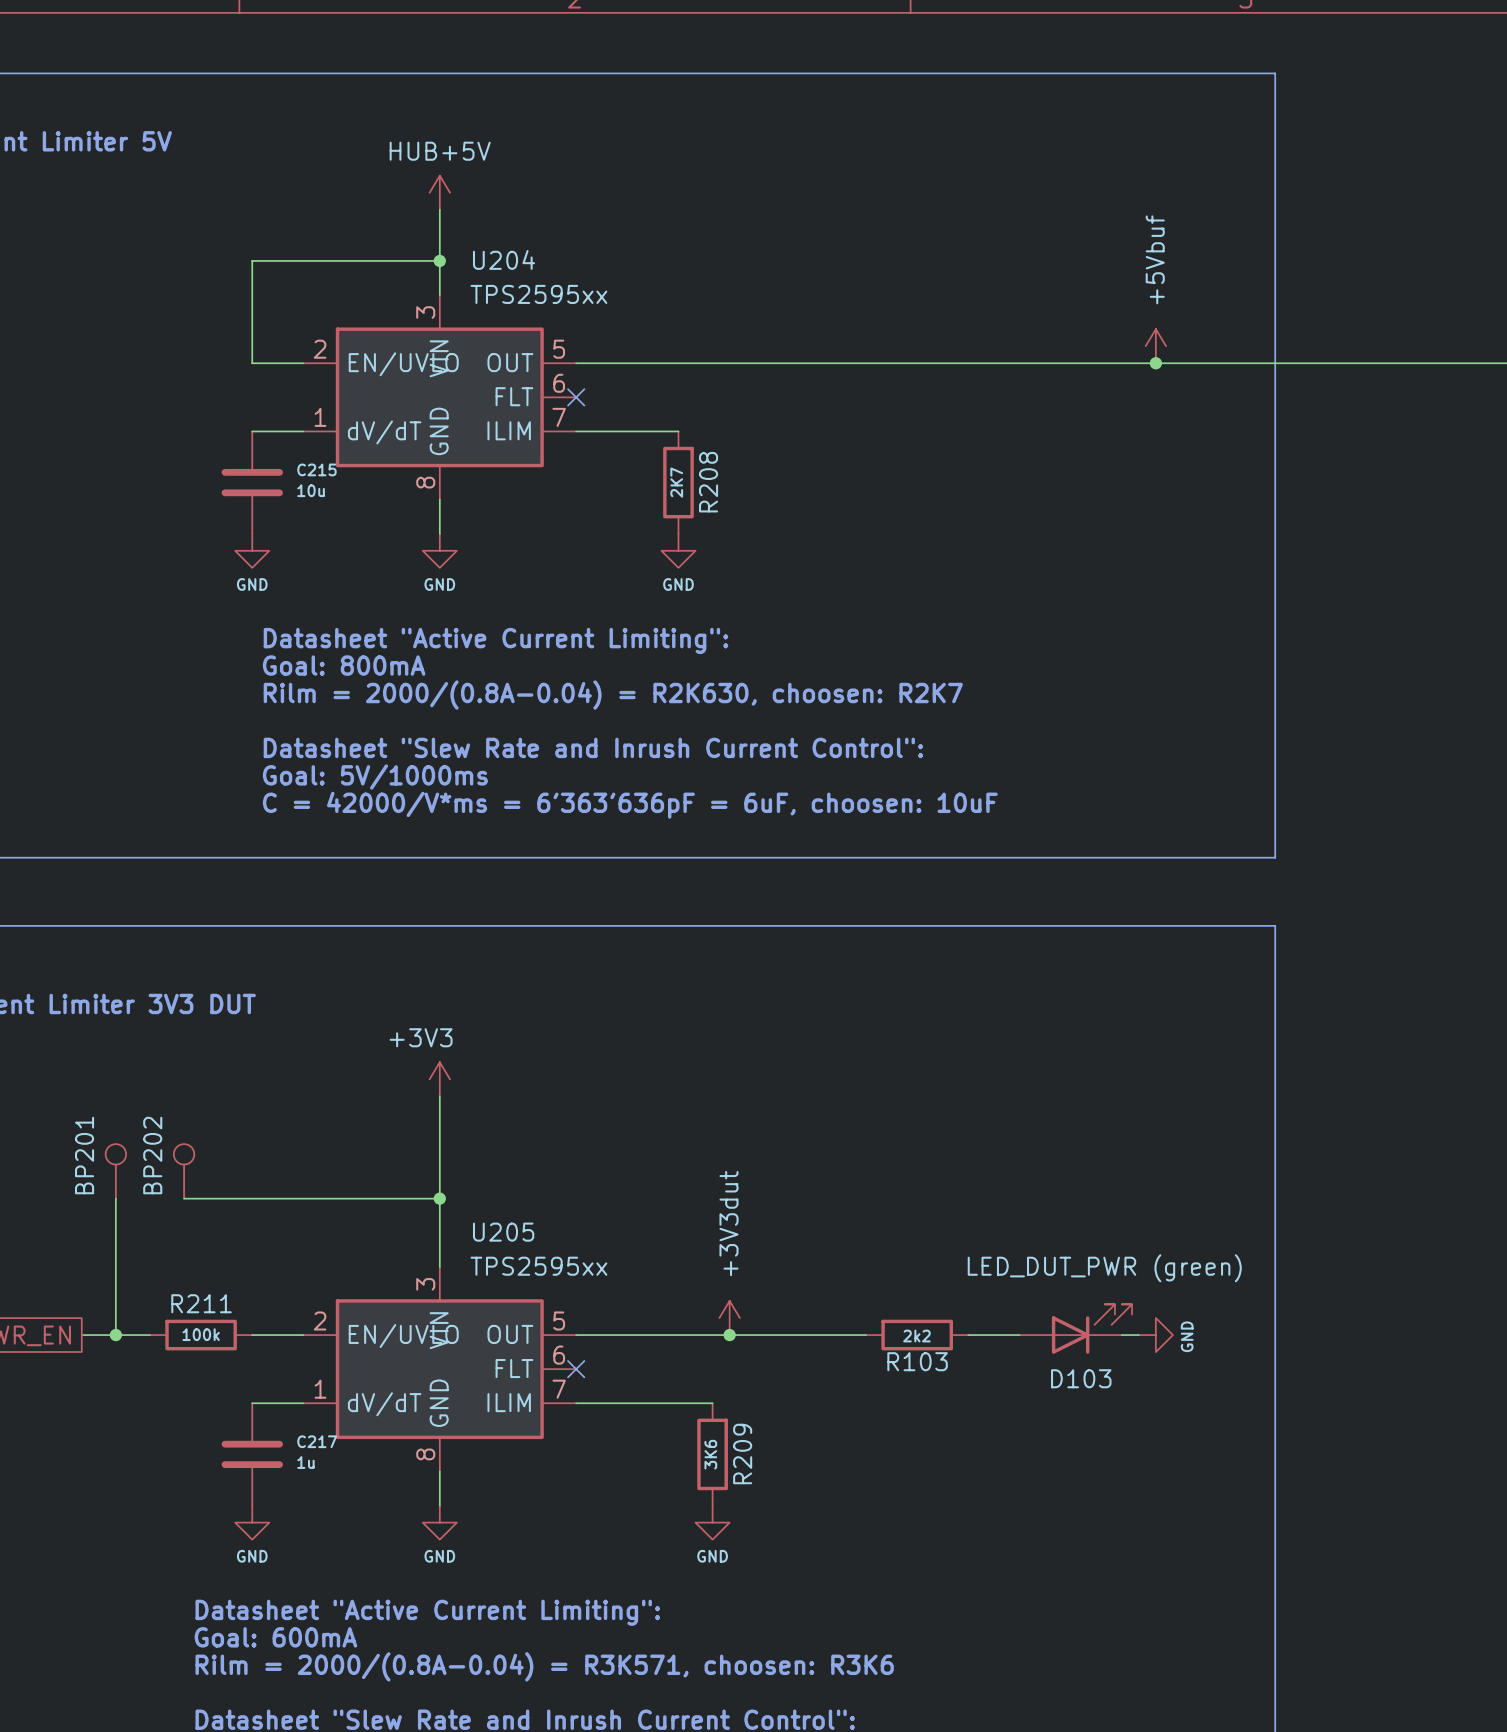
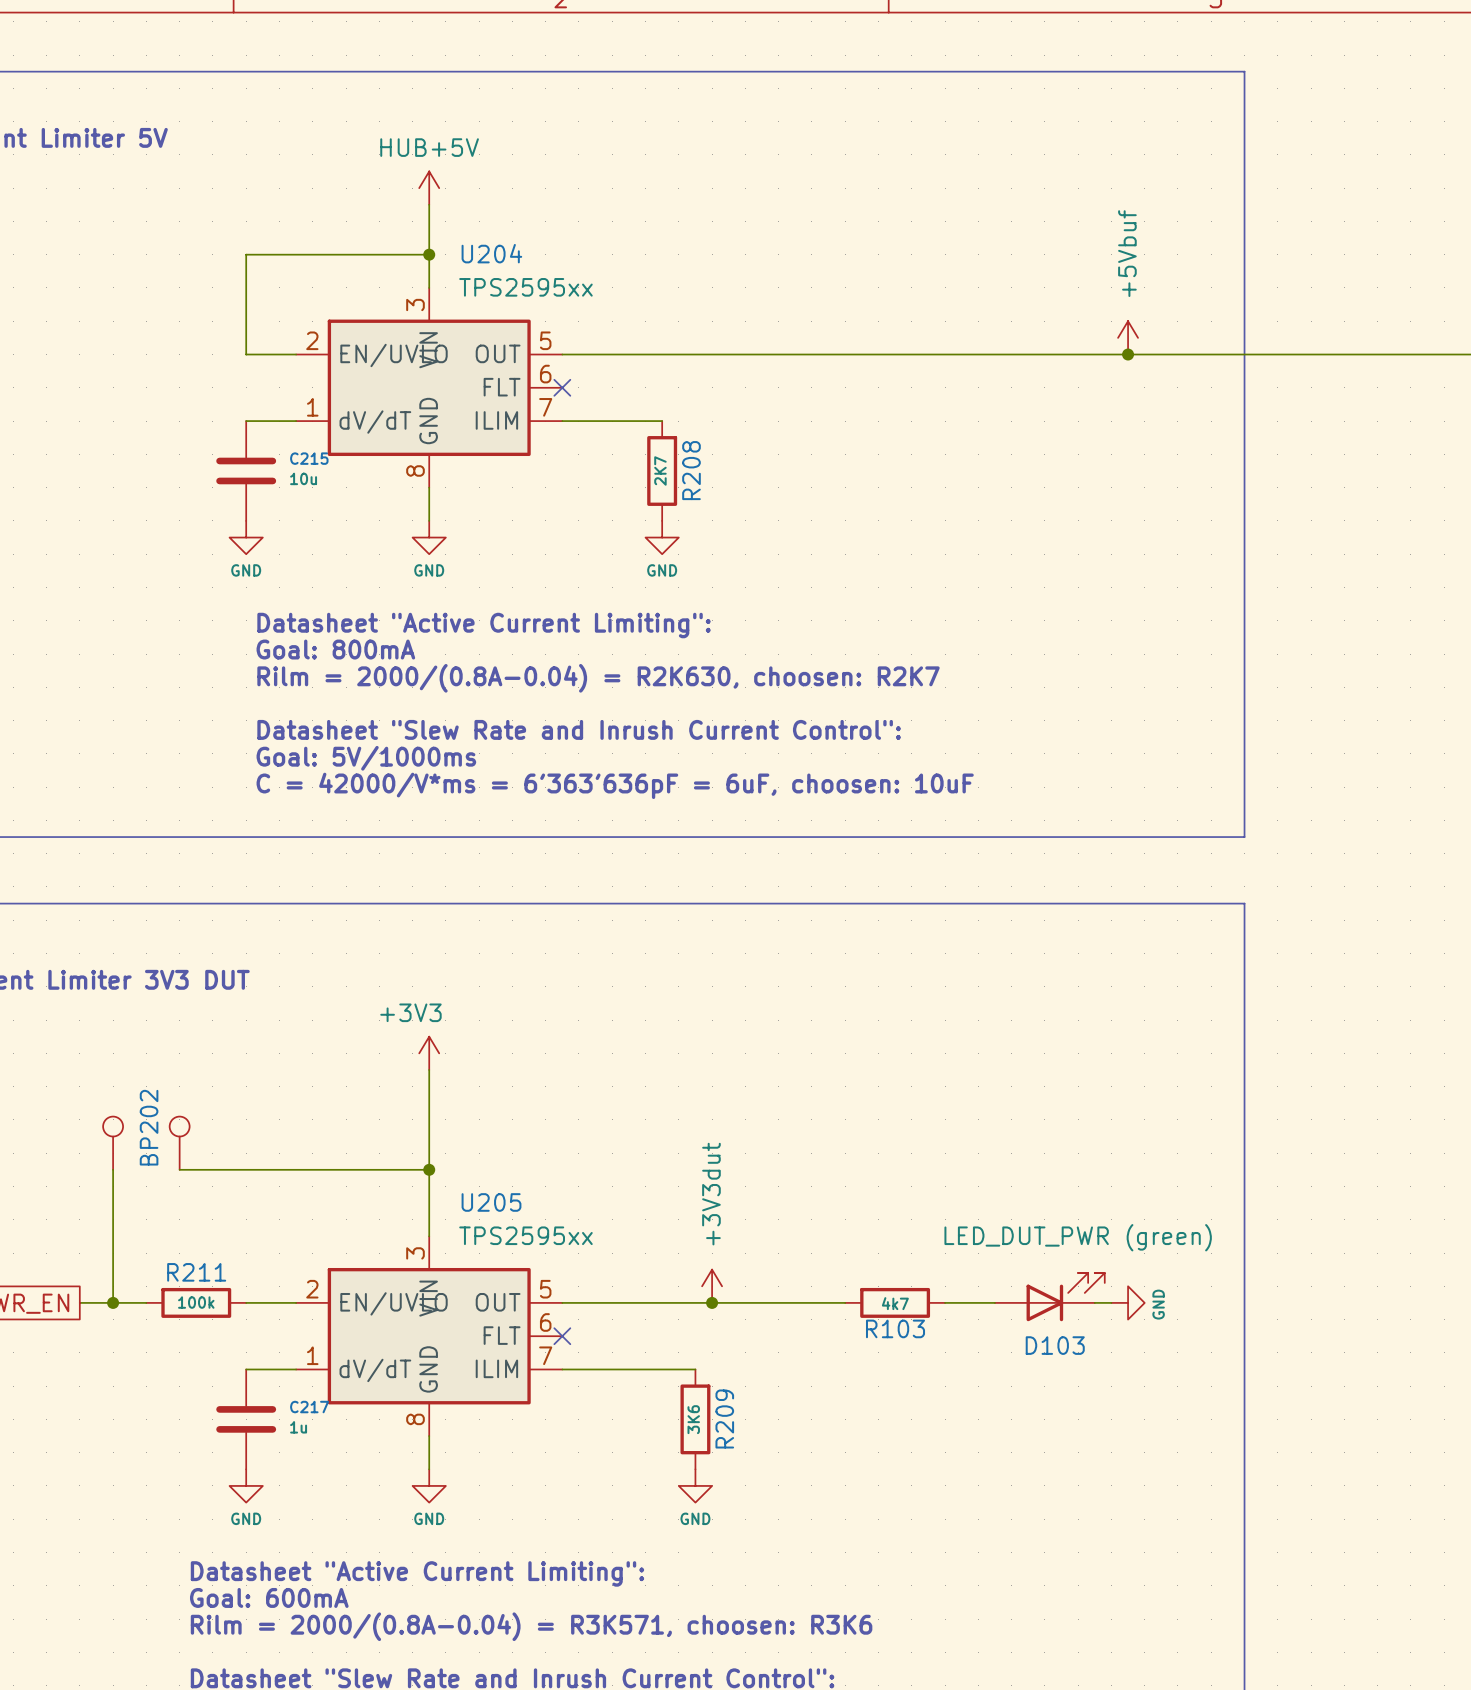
BP201 name: BP201 (84, 1155) -> none
R103 value: 2k2 (916, 1336) -> 4k7 (895, 1303)

